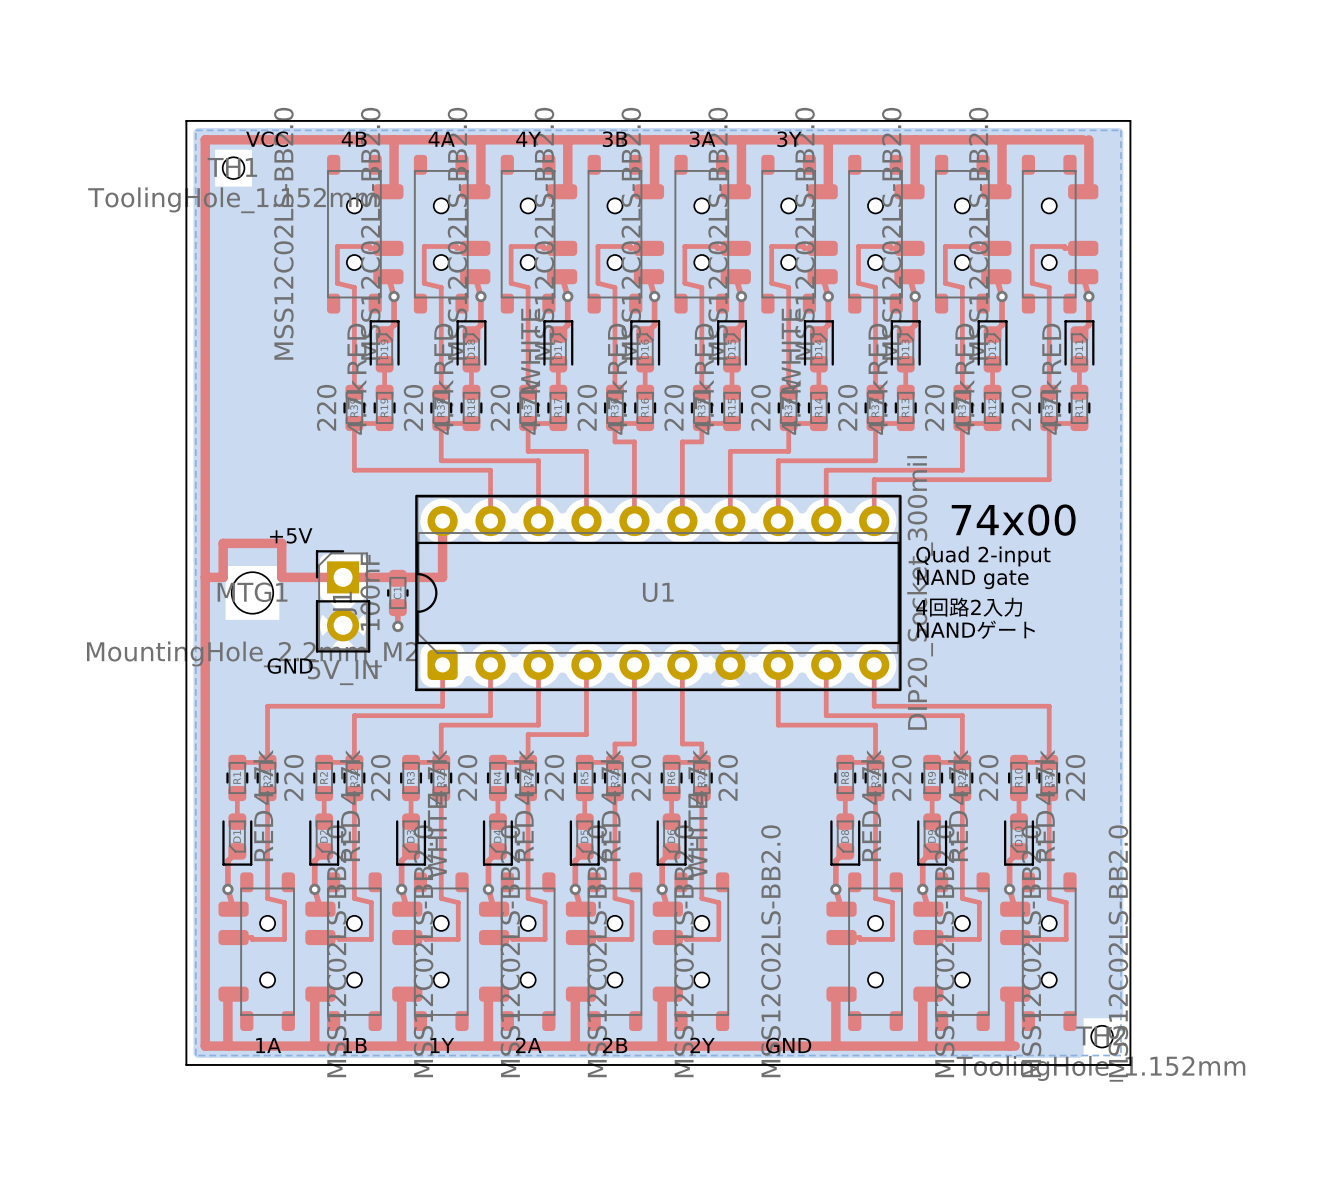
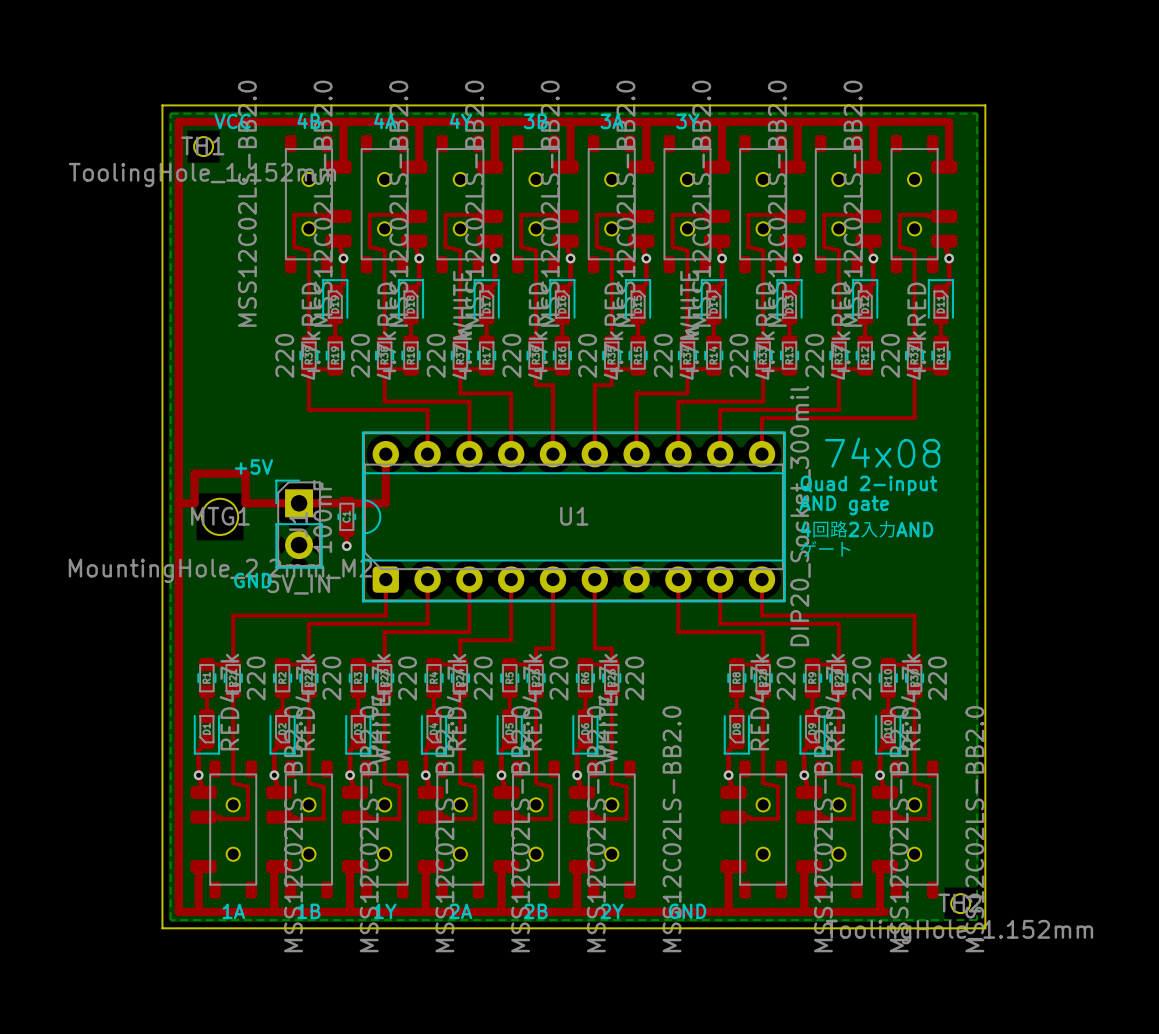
text: 74x00 (1013, 520) -> 74x08 (882, 452)
text: NAND gate (972, 579) -> AND gate (844, 505)
text: 4回路2入力 (969, 607) -> 4回路2入力AND (866, 529)
text: NANDゲート (976, 629) -> ゲート (825, 548)

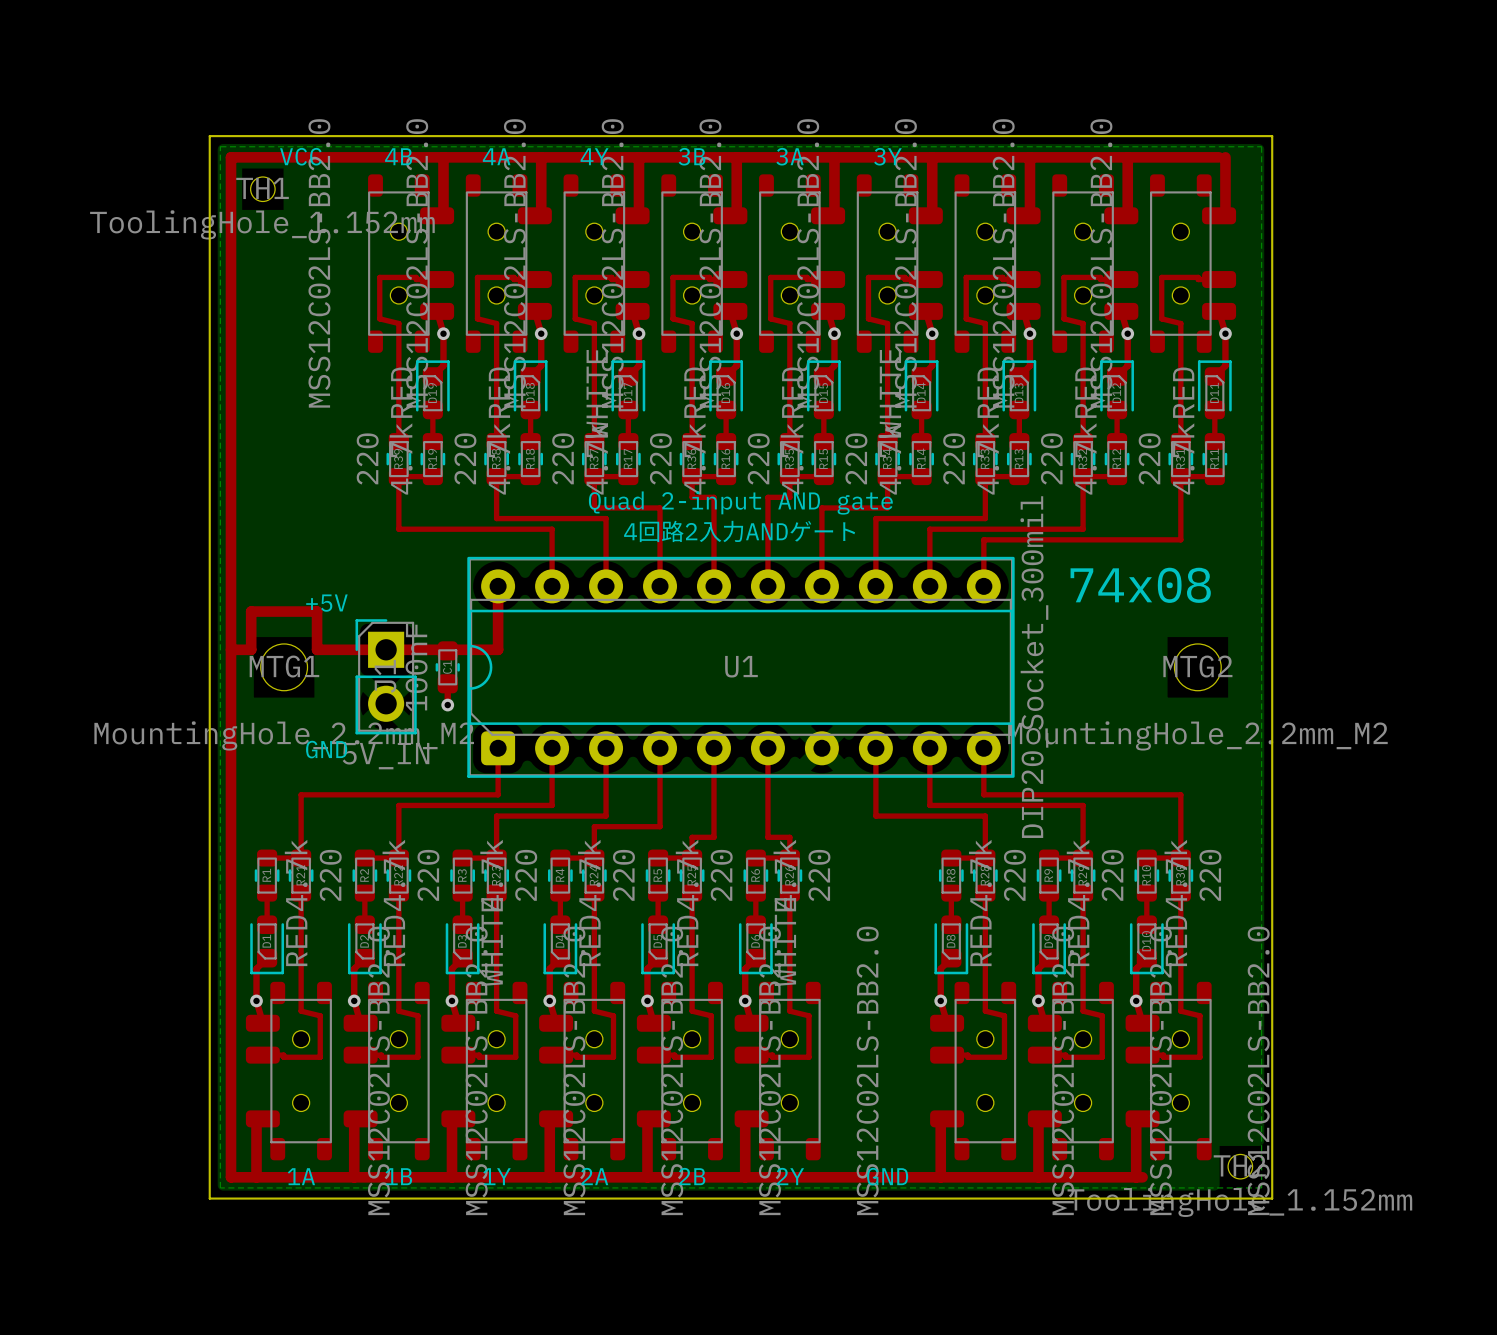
text: none -> Quad 2-input AND gate (740, 502)
text: none -> 4回路2入力ANDゲート (739, 531)
text: Quad 2-input (868, 485) -> none
text: AND gate (844, 505) -> none
MTG2: none -> MountingHole_2.2mm_M2 (1197, 667)
text: 4回路2入力AND (866, 529) -> none
text: ゲート (825, 548) -> none

